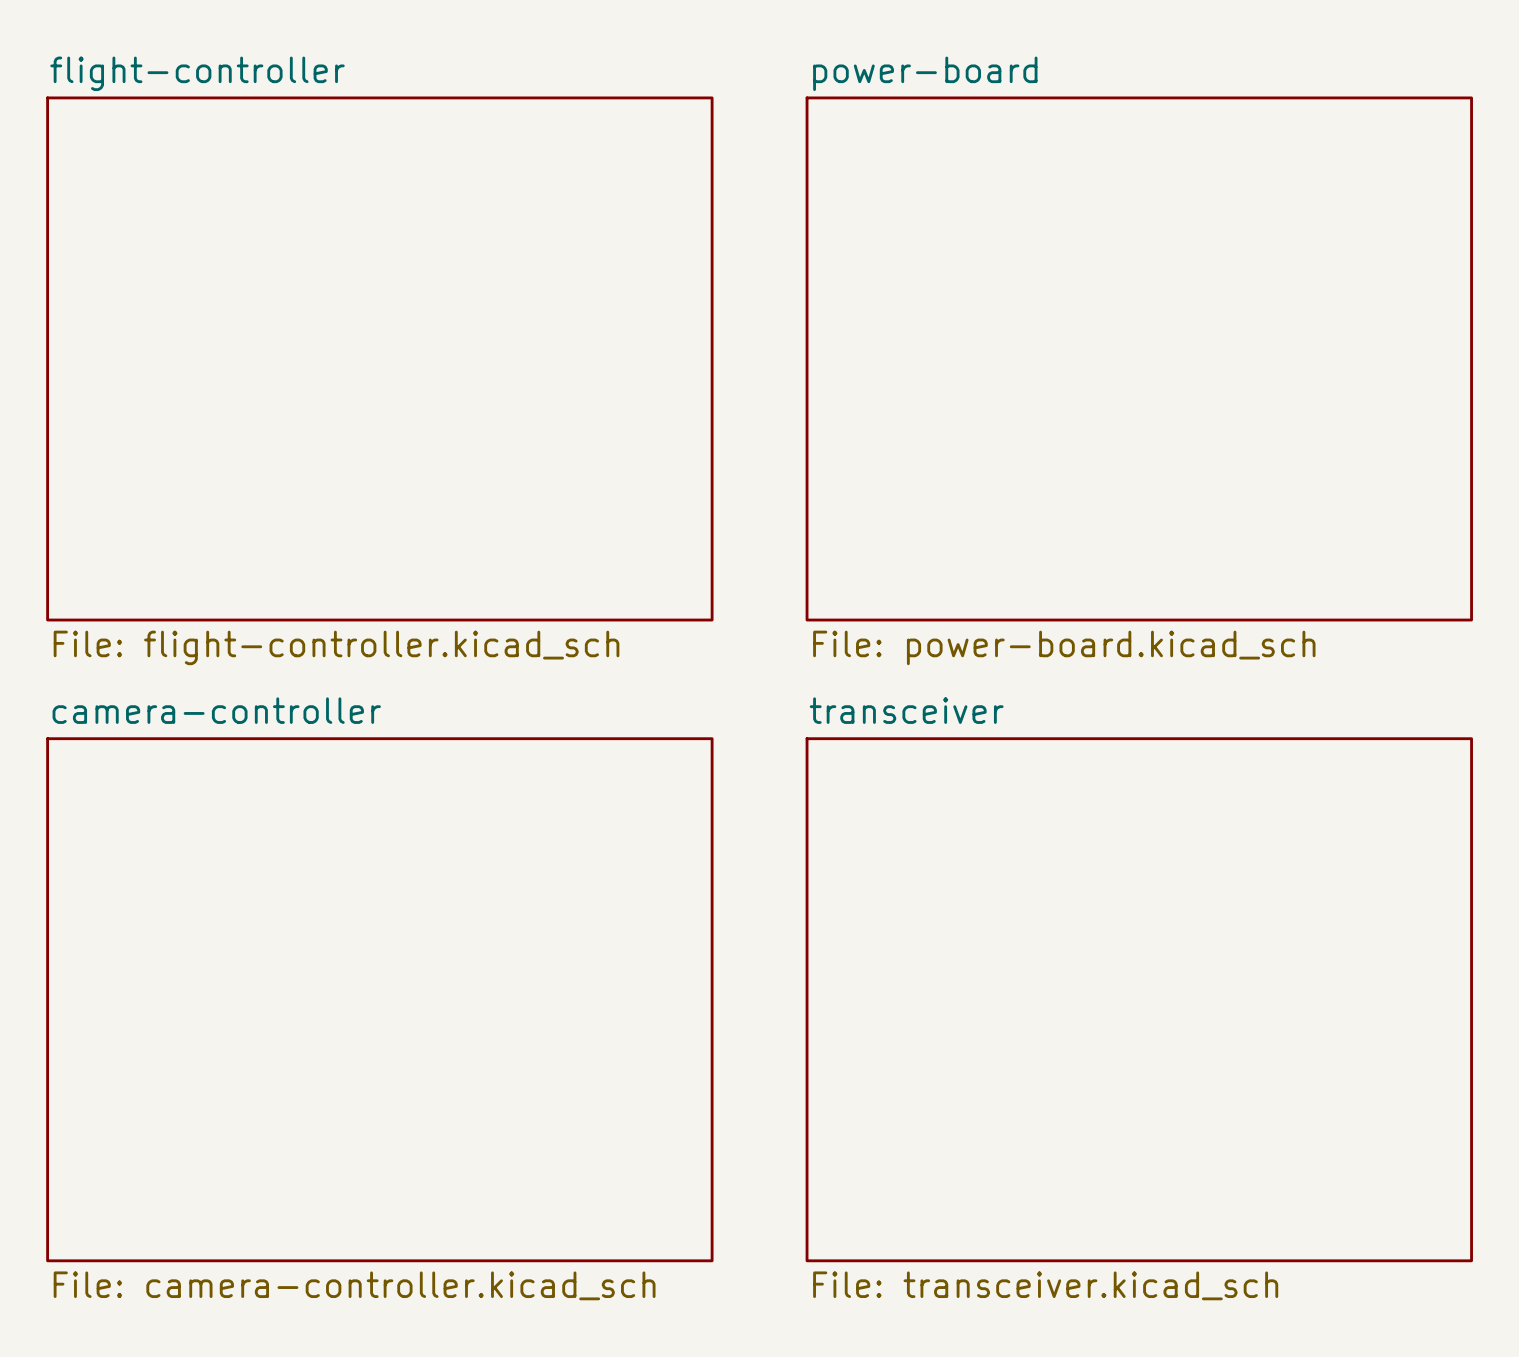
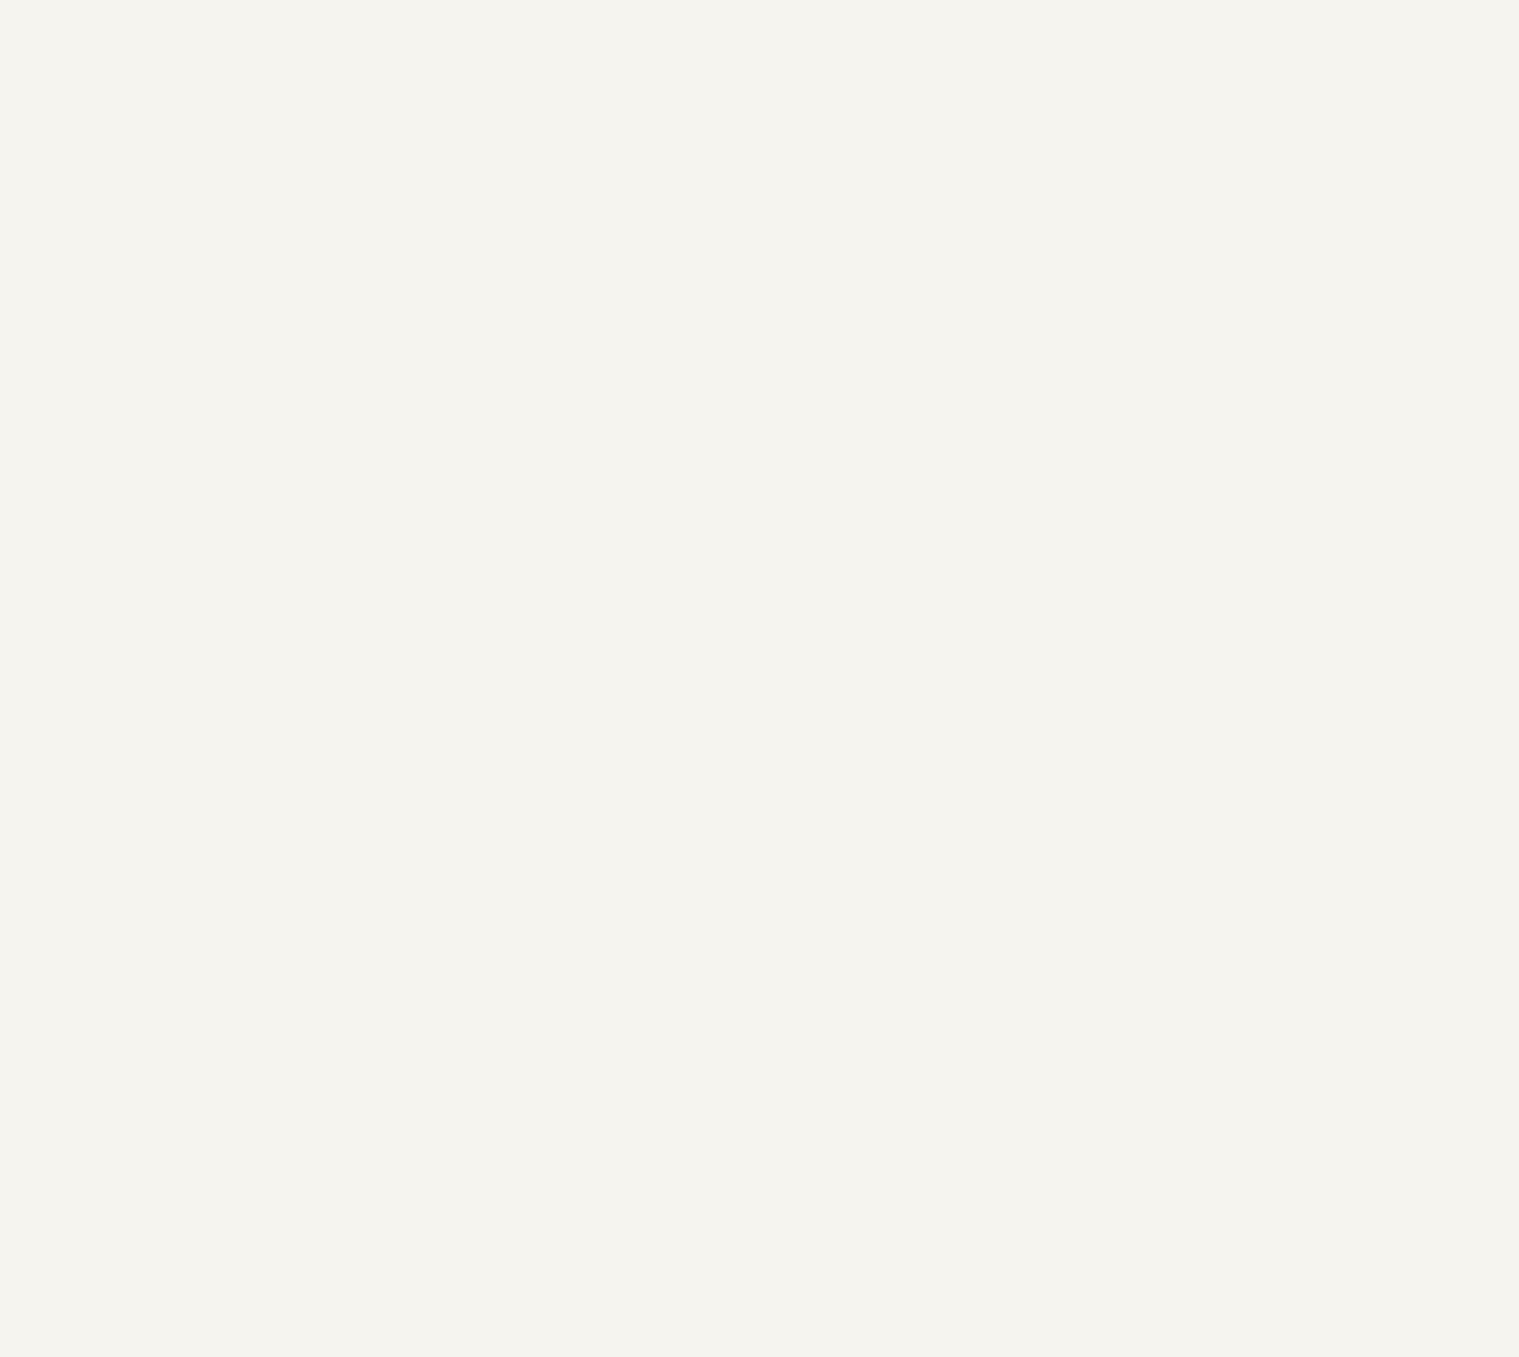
sheet flight-controller: File: flight-controller.kicad_sch (379, 358) -> none
sheet power-board: File: power-board.kicad_sch (1139, 358) -> none
sheet camera-controller: File: camera-controller.kicad_sch (379, 999) -> none
sheet transceiver: File: transceiver.kicad_sch (1139, 999) -> none

